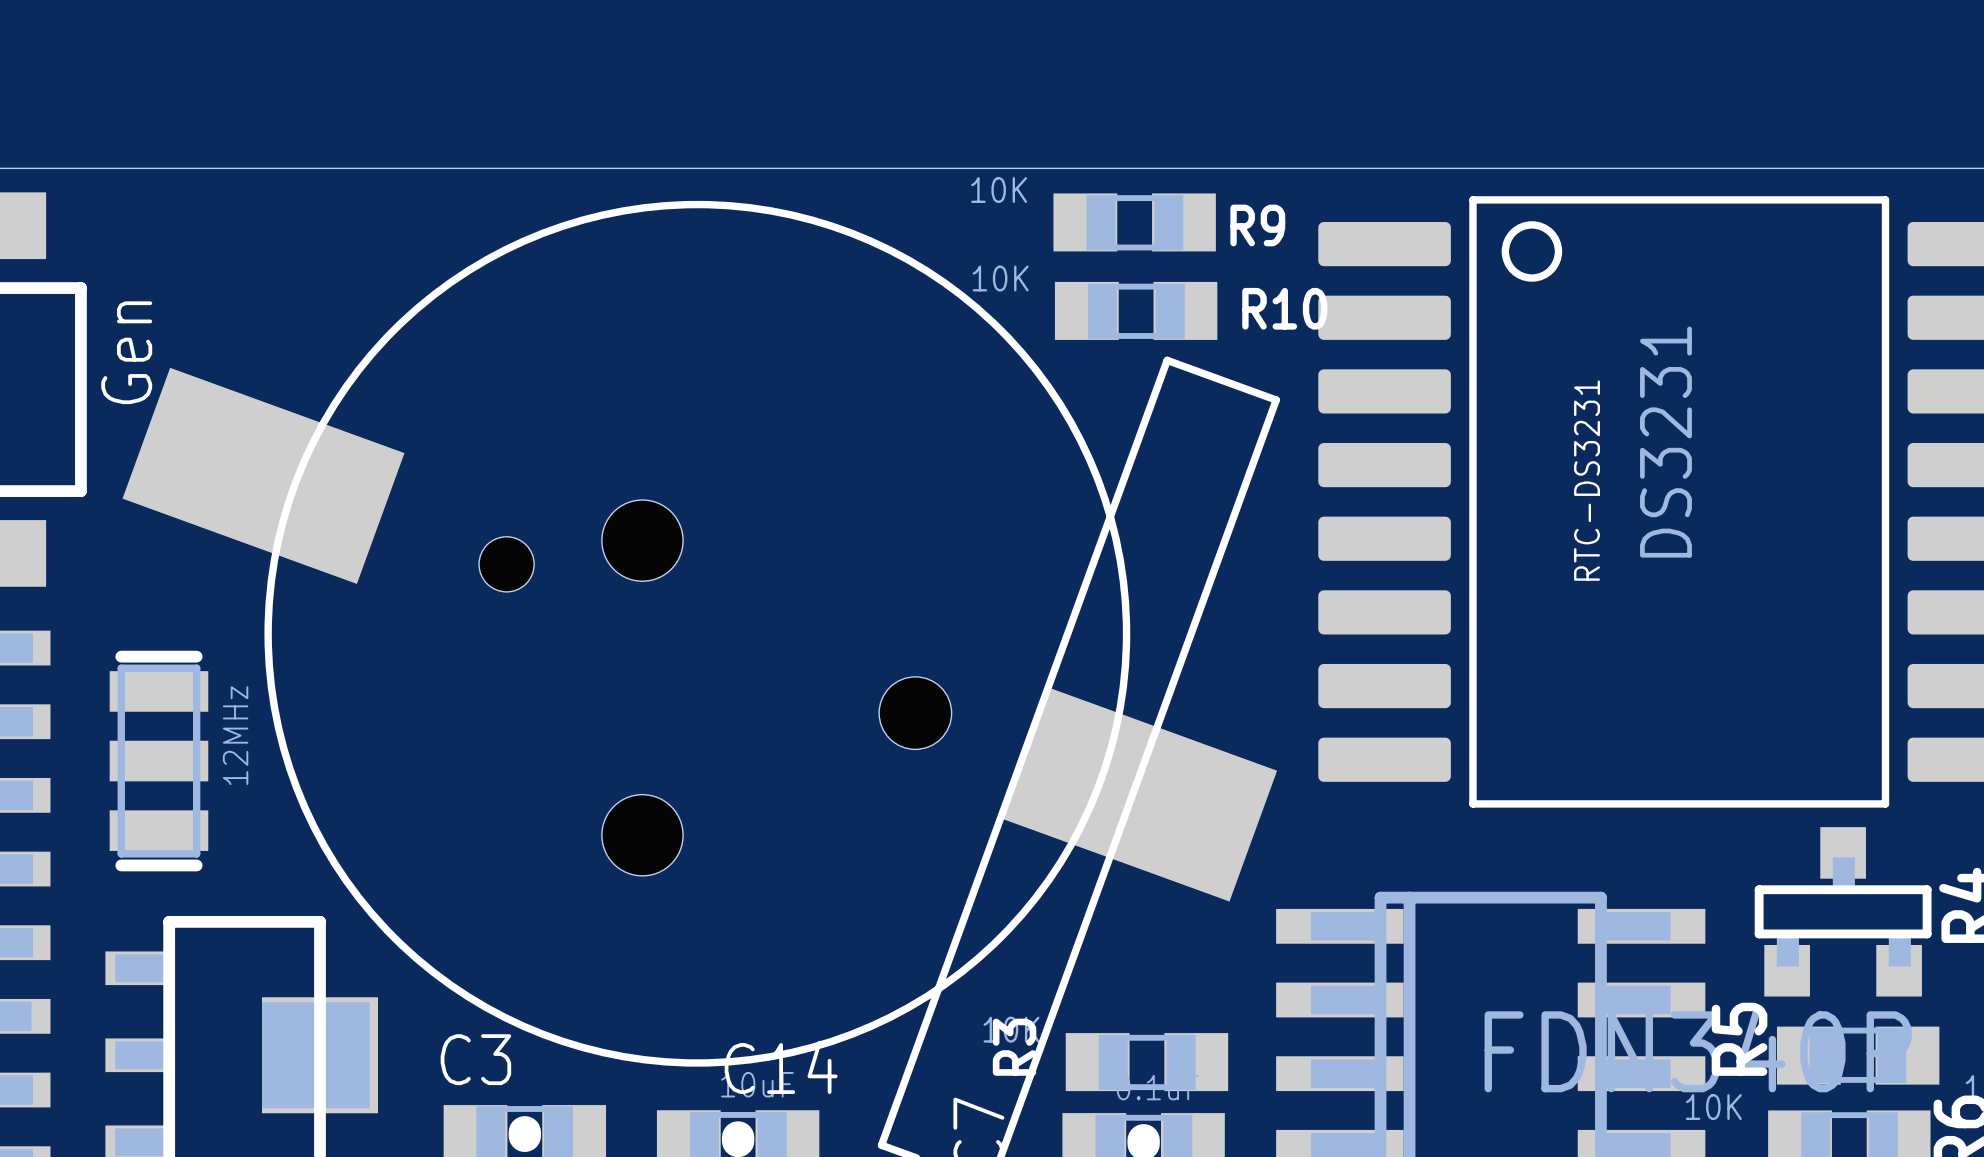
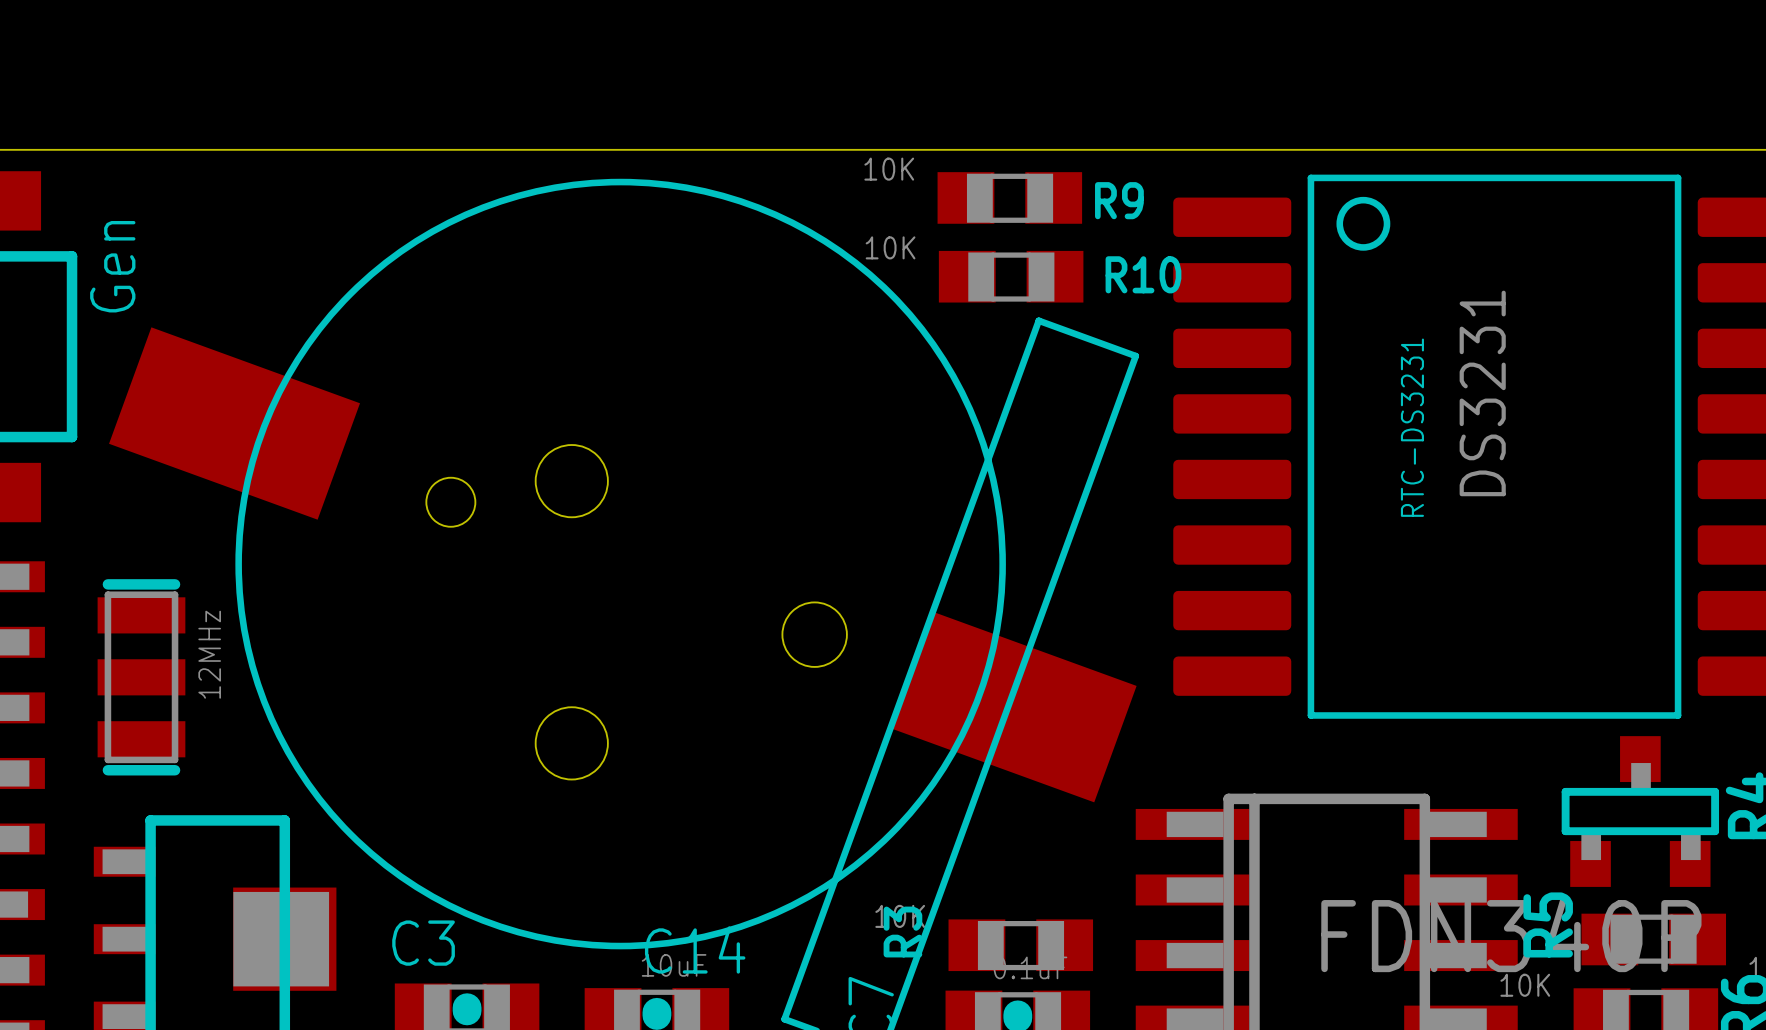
text position: Gen (126, 352) -> Gen (112, 266)

